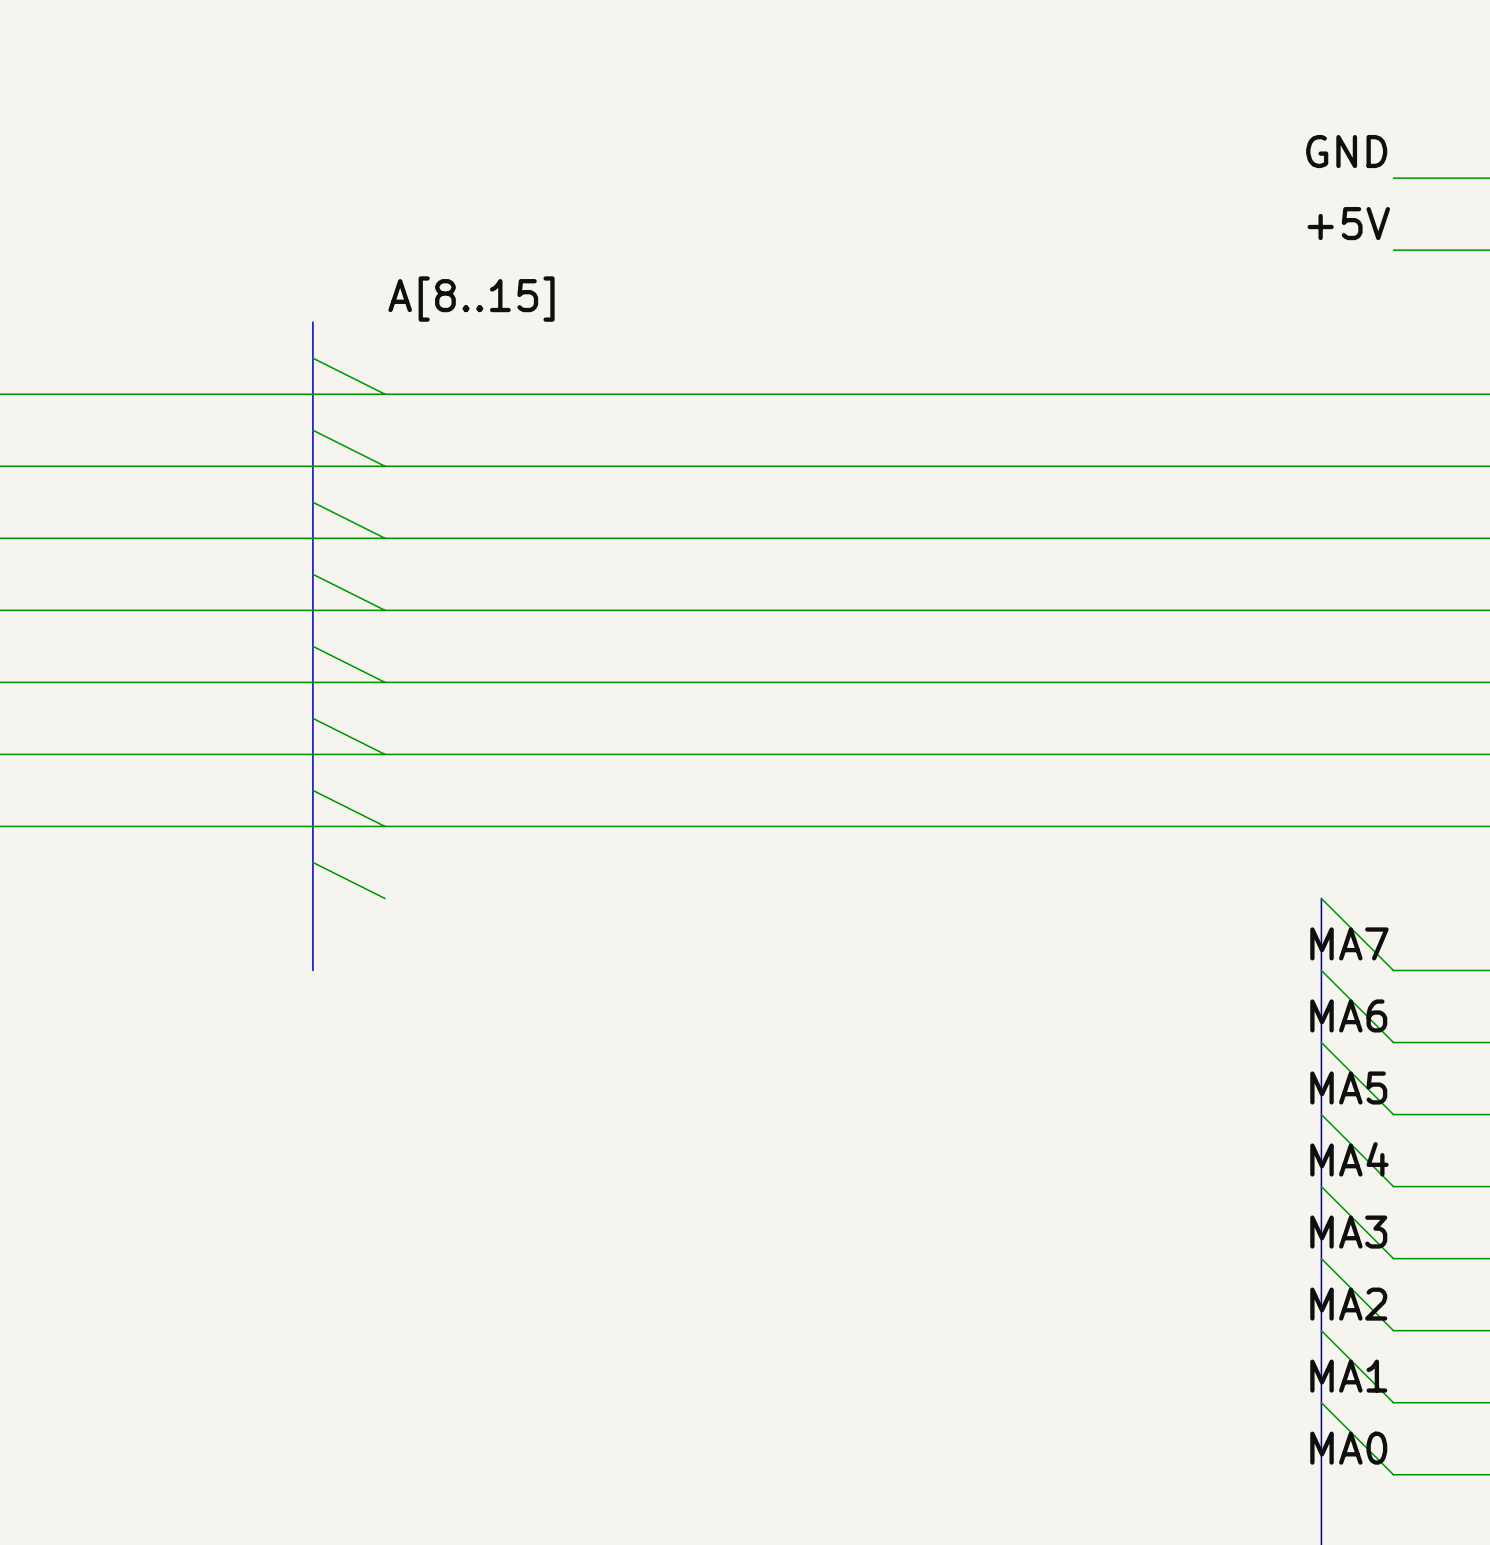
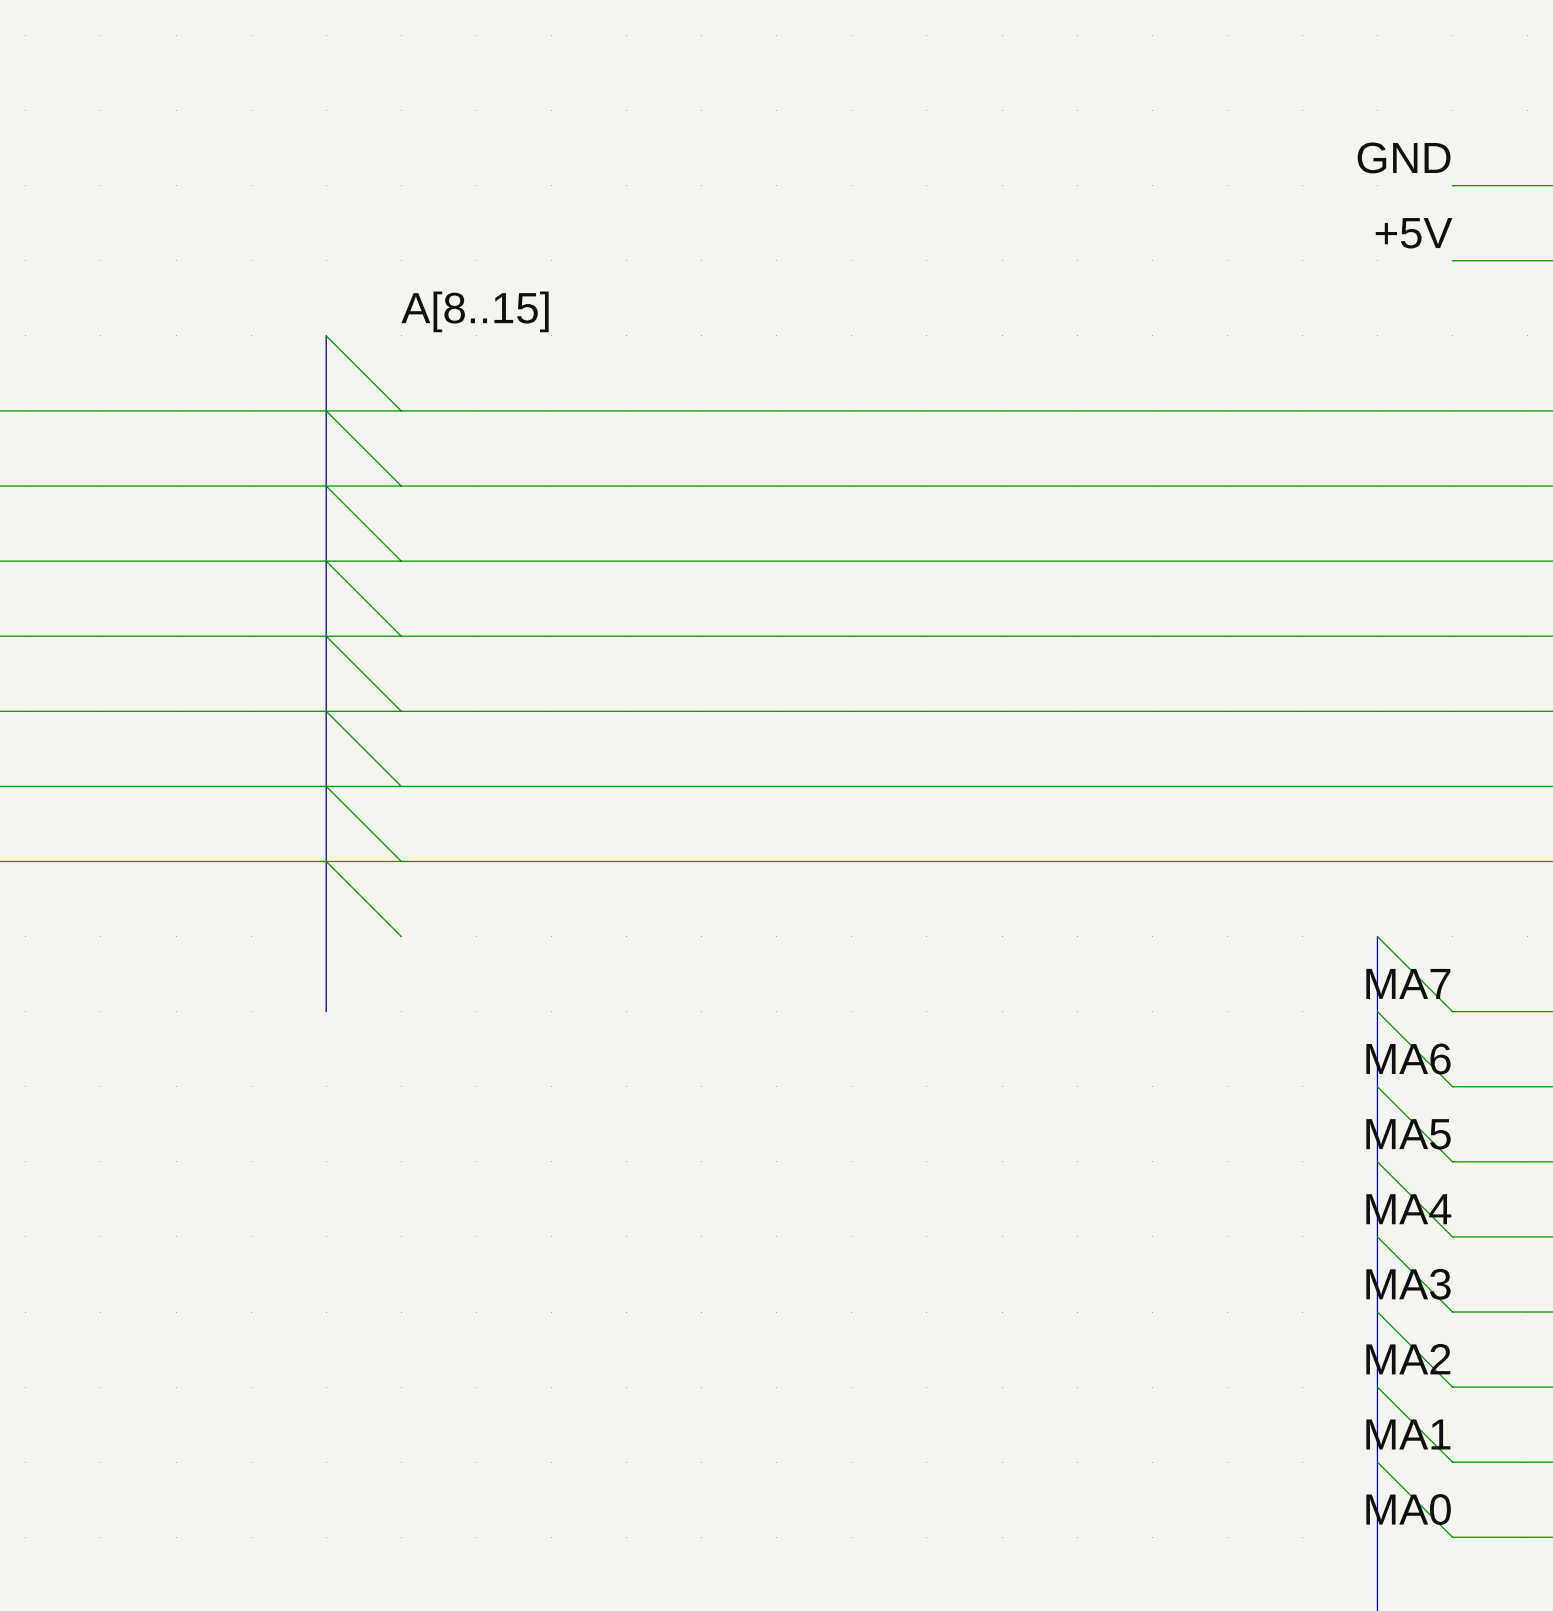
wire: (312, 358) (384, 394) -> (326, 335) (401, 410)
wire: (312, 430) (384, 466) -> (326, 410) (401, 486)
wire: (312, 502) (384, 538) -> (326, 486) (401, 561)
wire: (312, 574) (384, 610) -> (326, 561) (401, 636)
wire: (312, 646) (384, 682) -> (326, 636) (401, 711)
wire: (312, 718) (384, 754) -> (326, 711) (401, 786)
wire: (312, 790) (384, 826) -> (326, 786) (401, 861)
wire: (312, 862) (384, 898) -> (326, 861) (401, 936)

